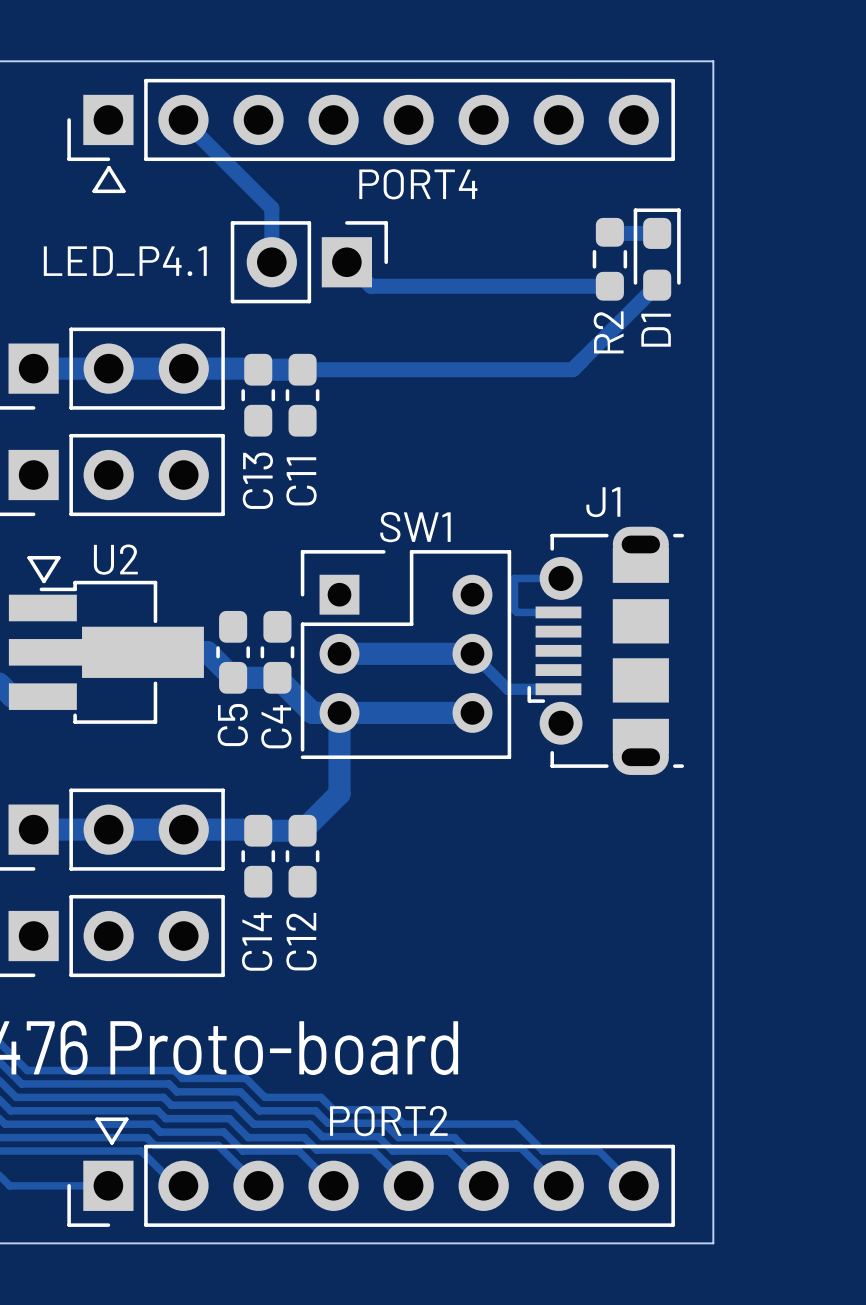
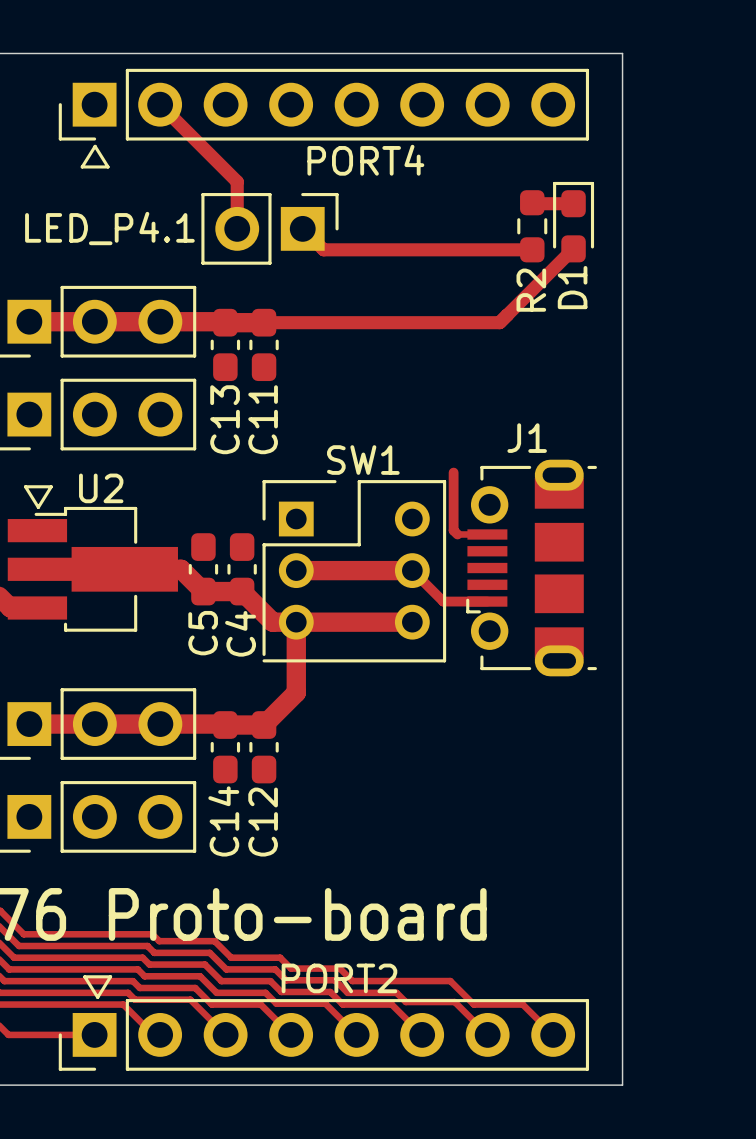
J1 footprint: [527, 526, 685, 775] -> [466, 459, 597, 677]
track: (561, 578) (514, 578) (514, 610) (516, 612) (524, 612) -> (453, 472) (453, 530) (457, 534)

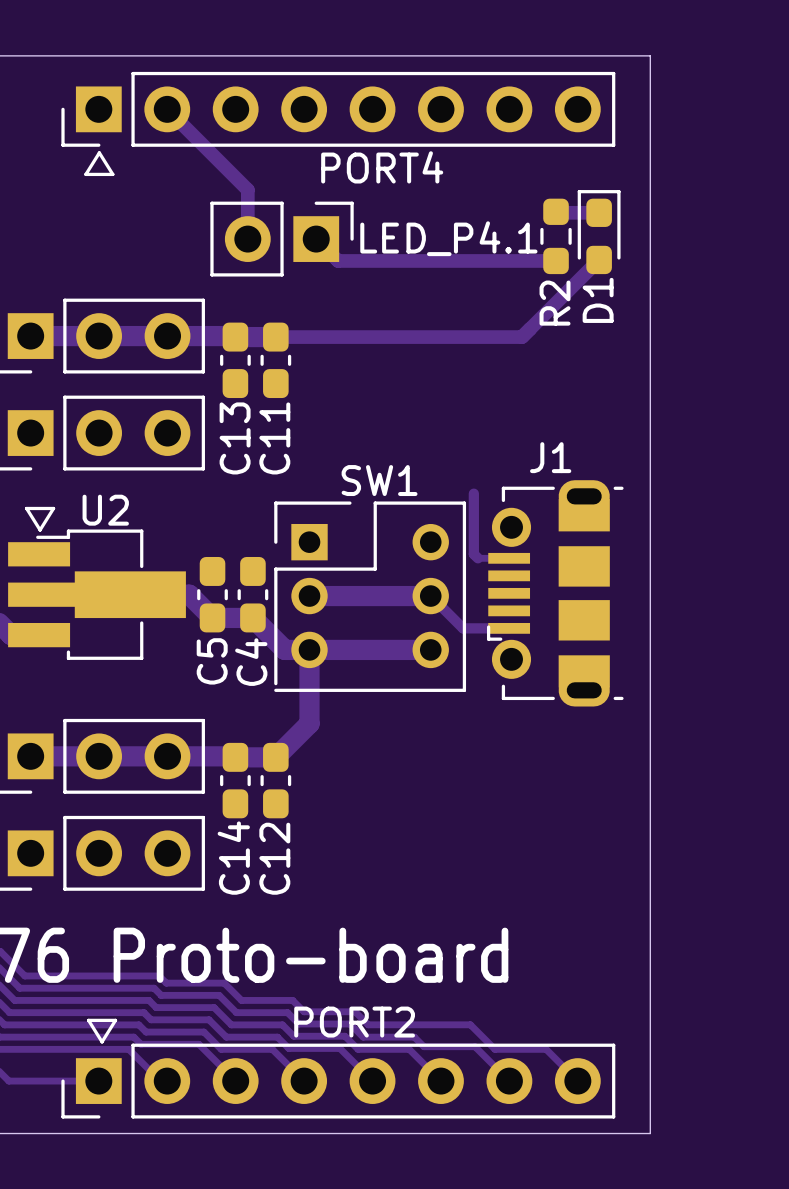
part value position: LED_P4.1 (109, 228) -> LED_P4.1 (448, 238)

